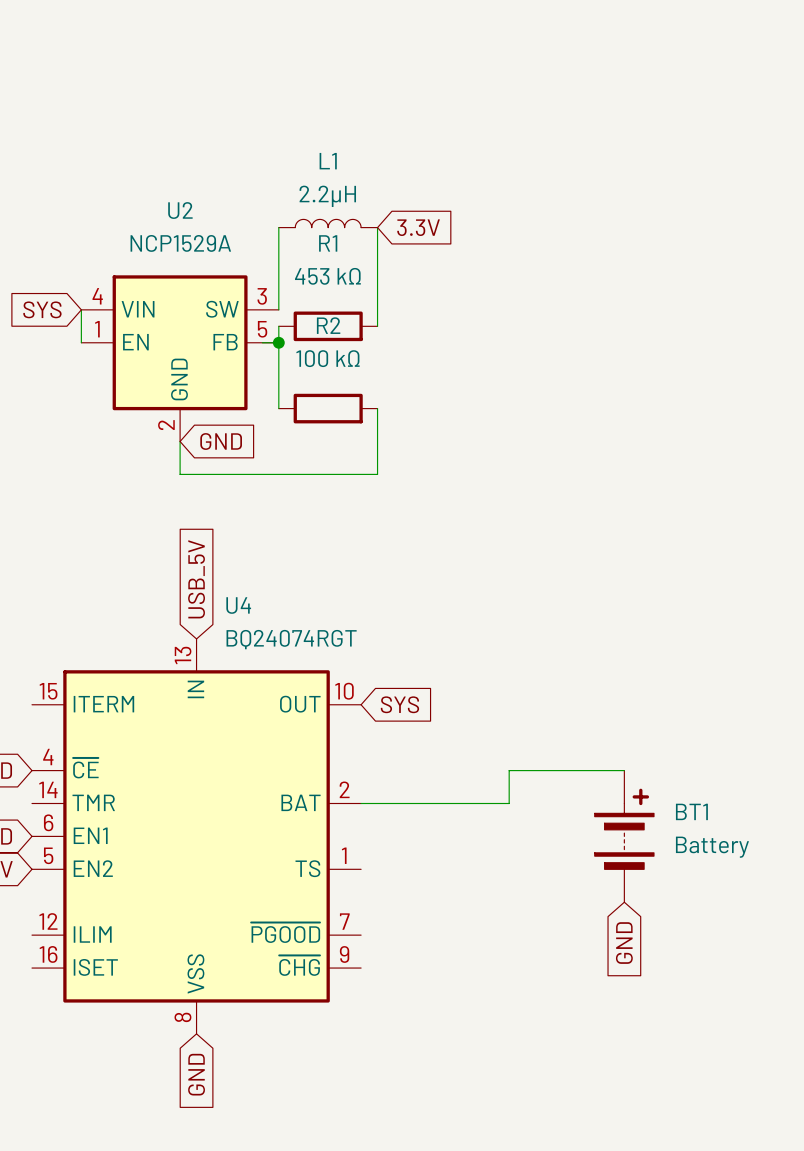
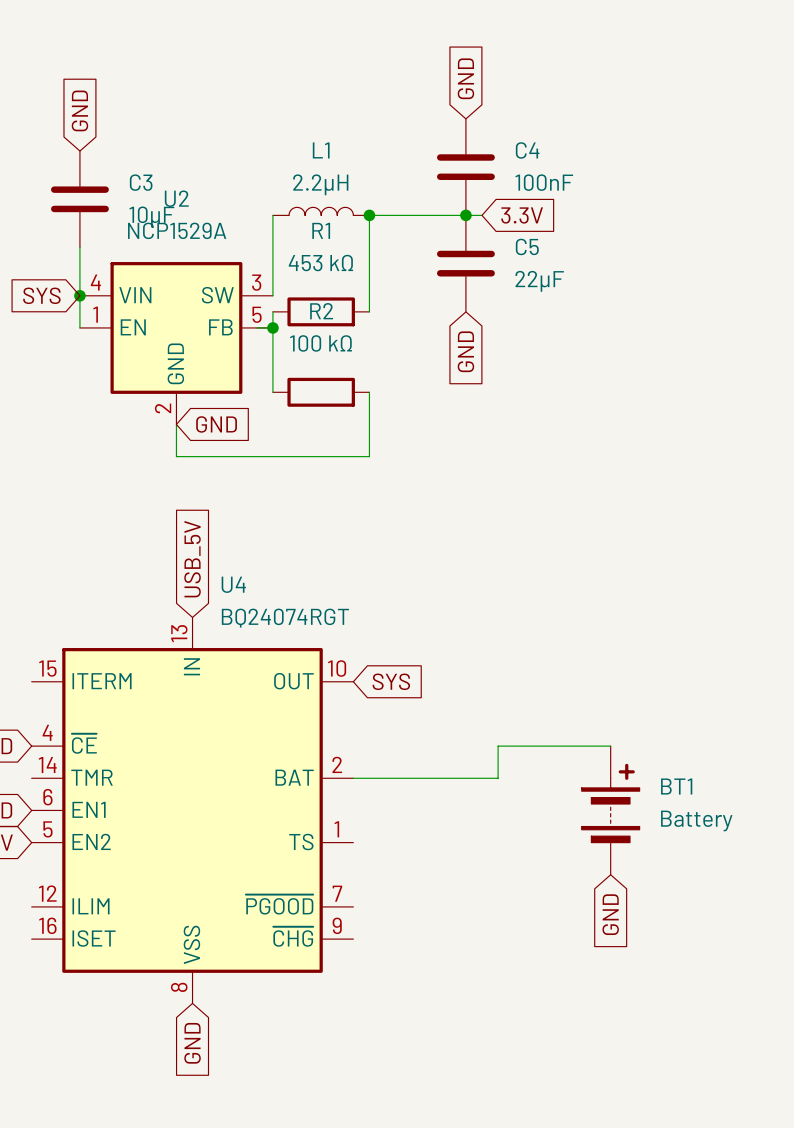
global label: none -> GND (465, 78)
global label: none -> GND (79, 110)
C4: none -> 100nF (465, 167)
C3: none -> 10µF (79, 199)
wire: none -> (369, 215) (482, 215)
junction: none -> (369, 215)
global label position: 3.3V (418, 227) -> 3.3V (522, 215)
junction: none -> (465, 215)
wire: none -> (79, 247) (79, 295)
C5: none -> 22µF (465, 263)
junction: none -> (79, 295)
global label: none -> GND (465, 351)

